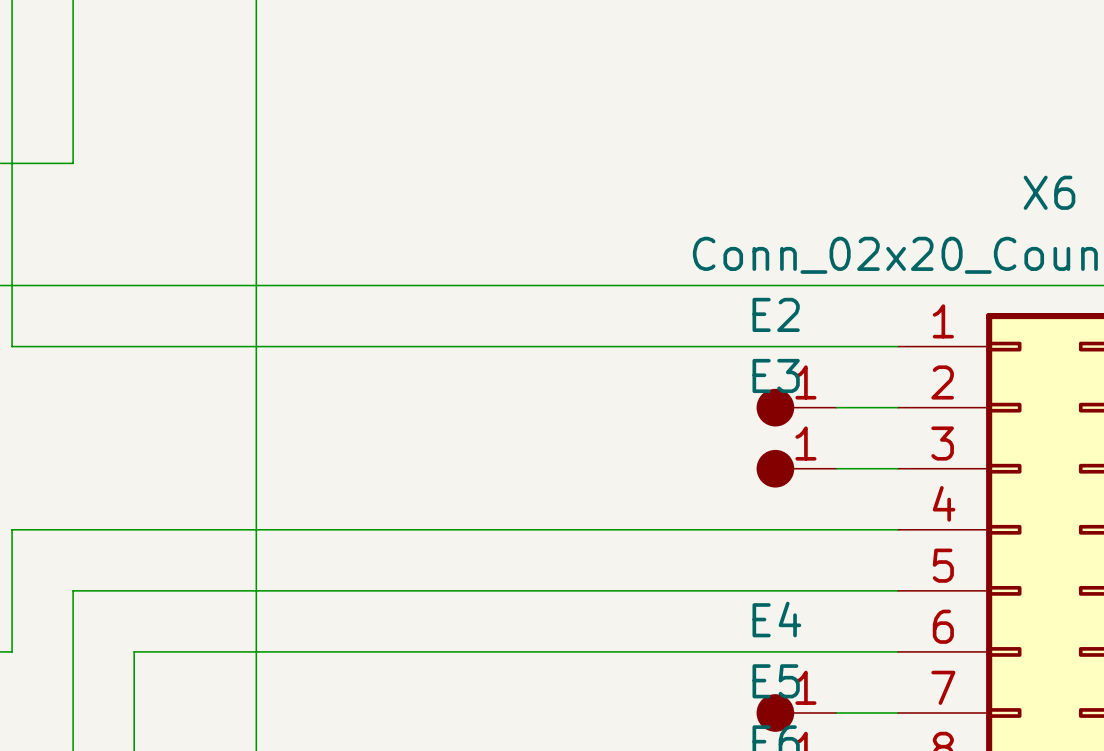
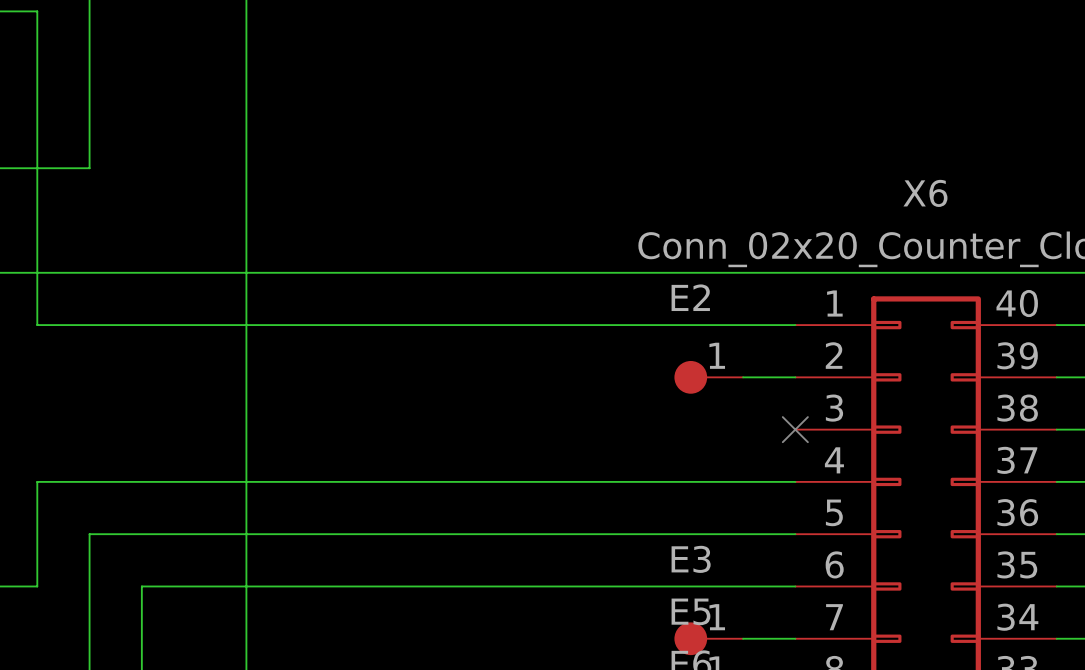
E3: (796, 468) -> none
wire: (836, 468) (897, 468) -> none
no-connect mark: none -> (795, 429)
E4 name: E4 (776, 619) -> E3 (691, 559)

